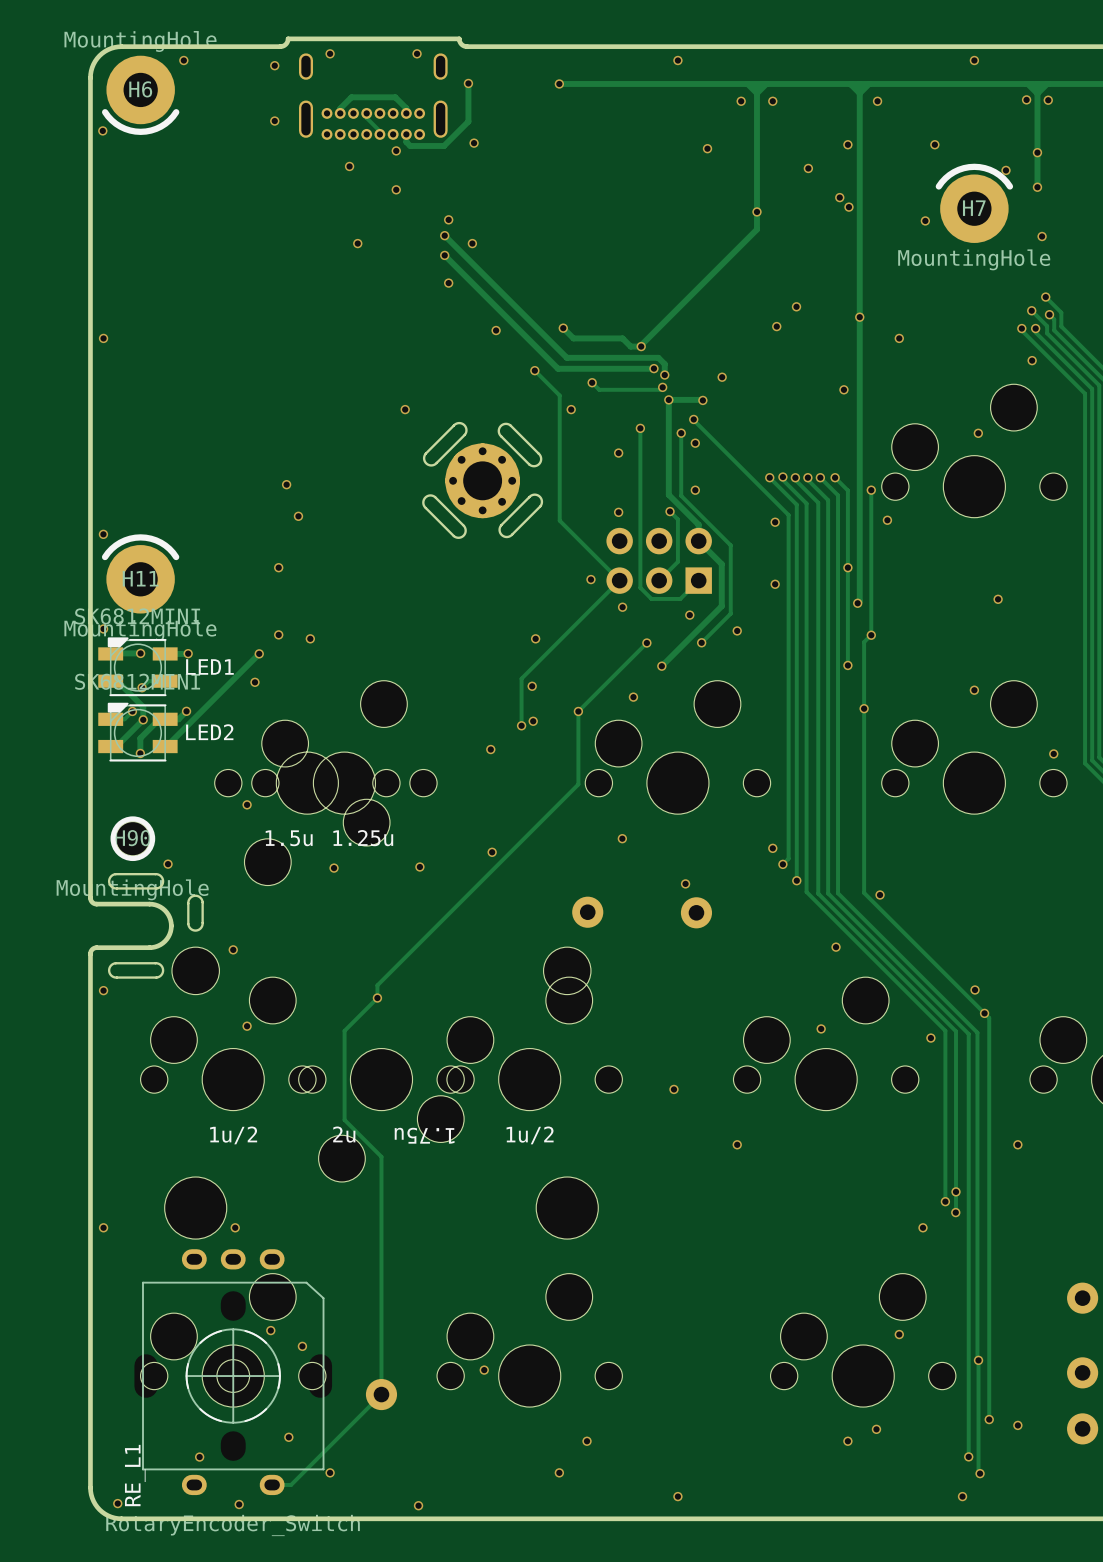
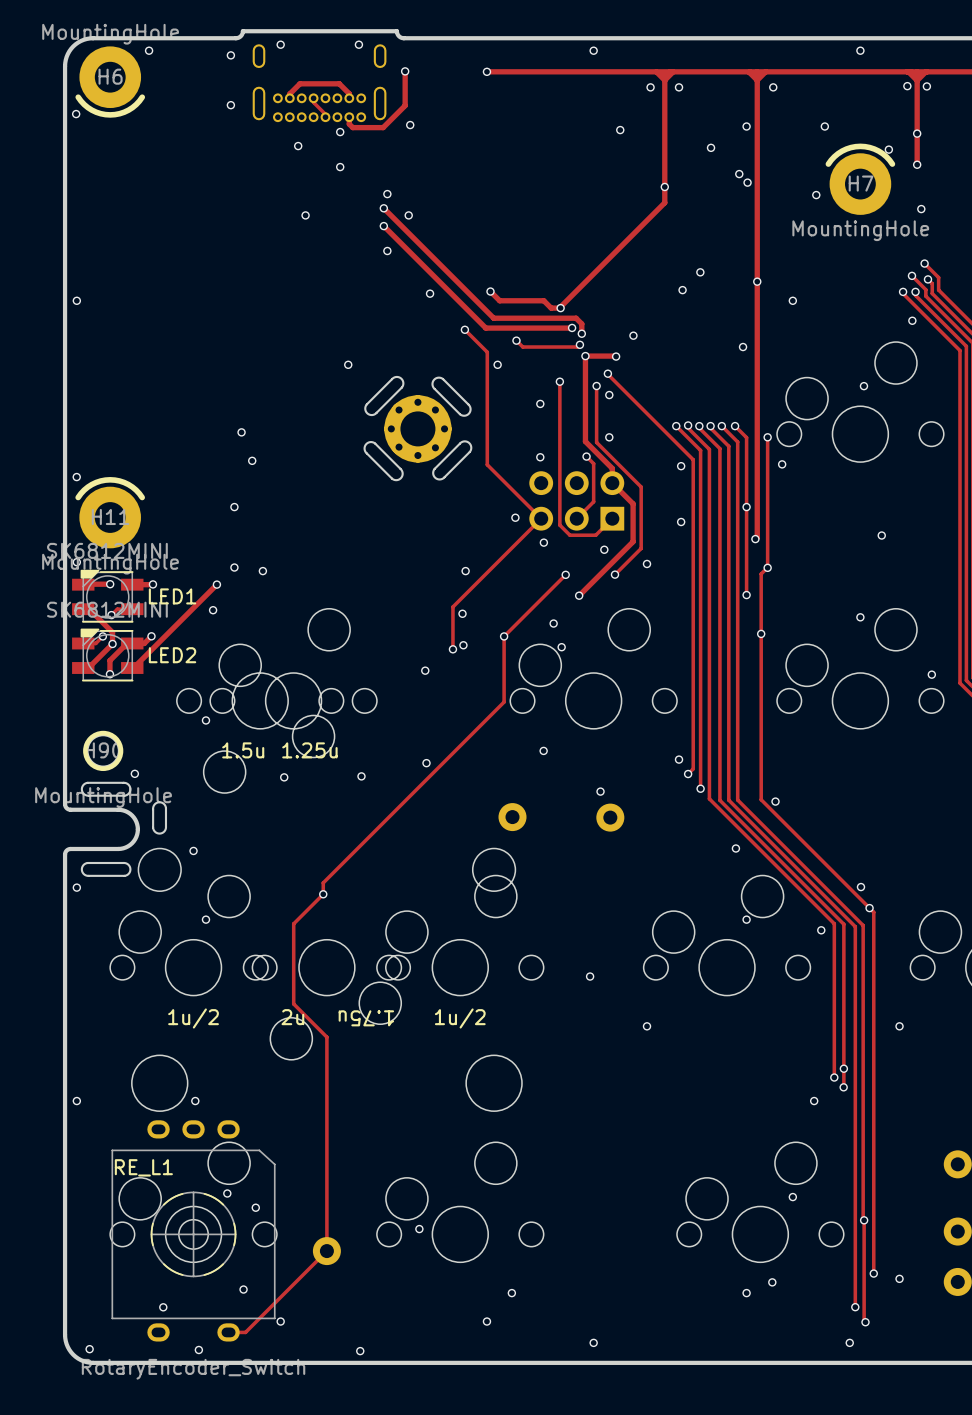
via: none -> (561, 647)
via position: (821, 1028) -> (746, 919)
RE_L1 name rotation: 0° (135, 1475) -> 90° clockwise (143, 1167)
RE_L1 name position: RE_L1 (135, 1475) -> RE_L1 (143, 1167)

